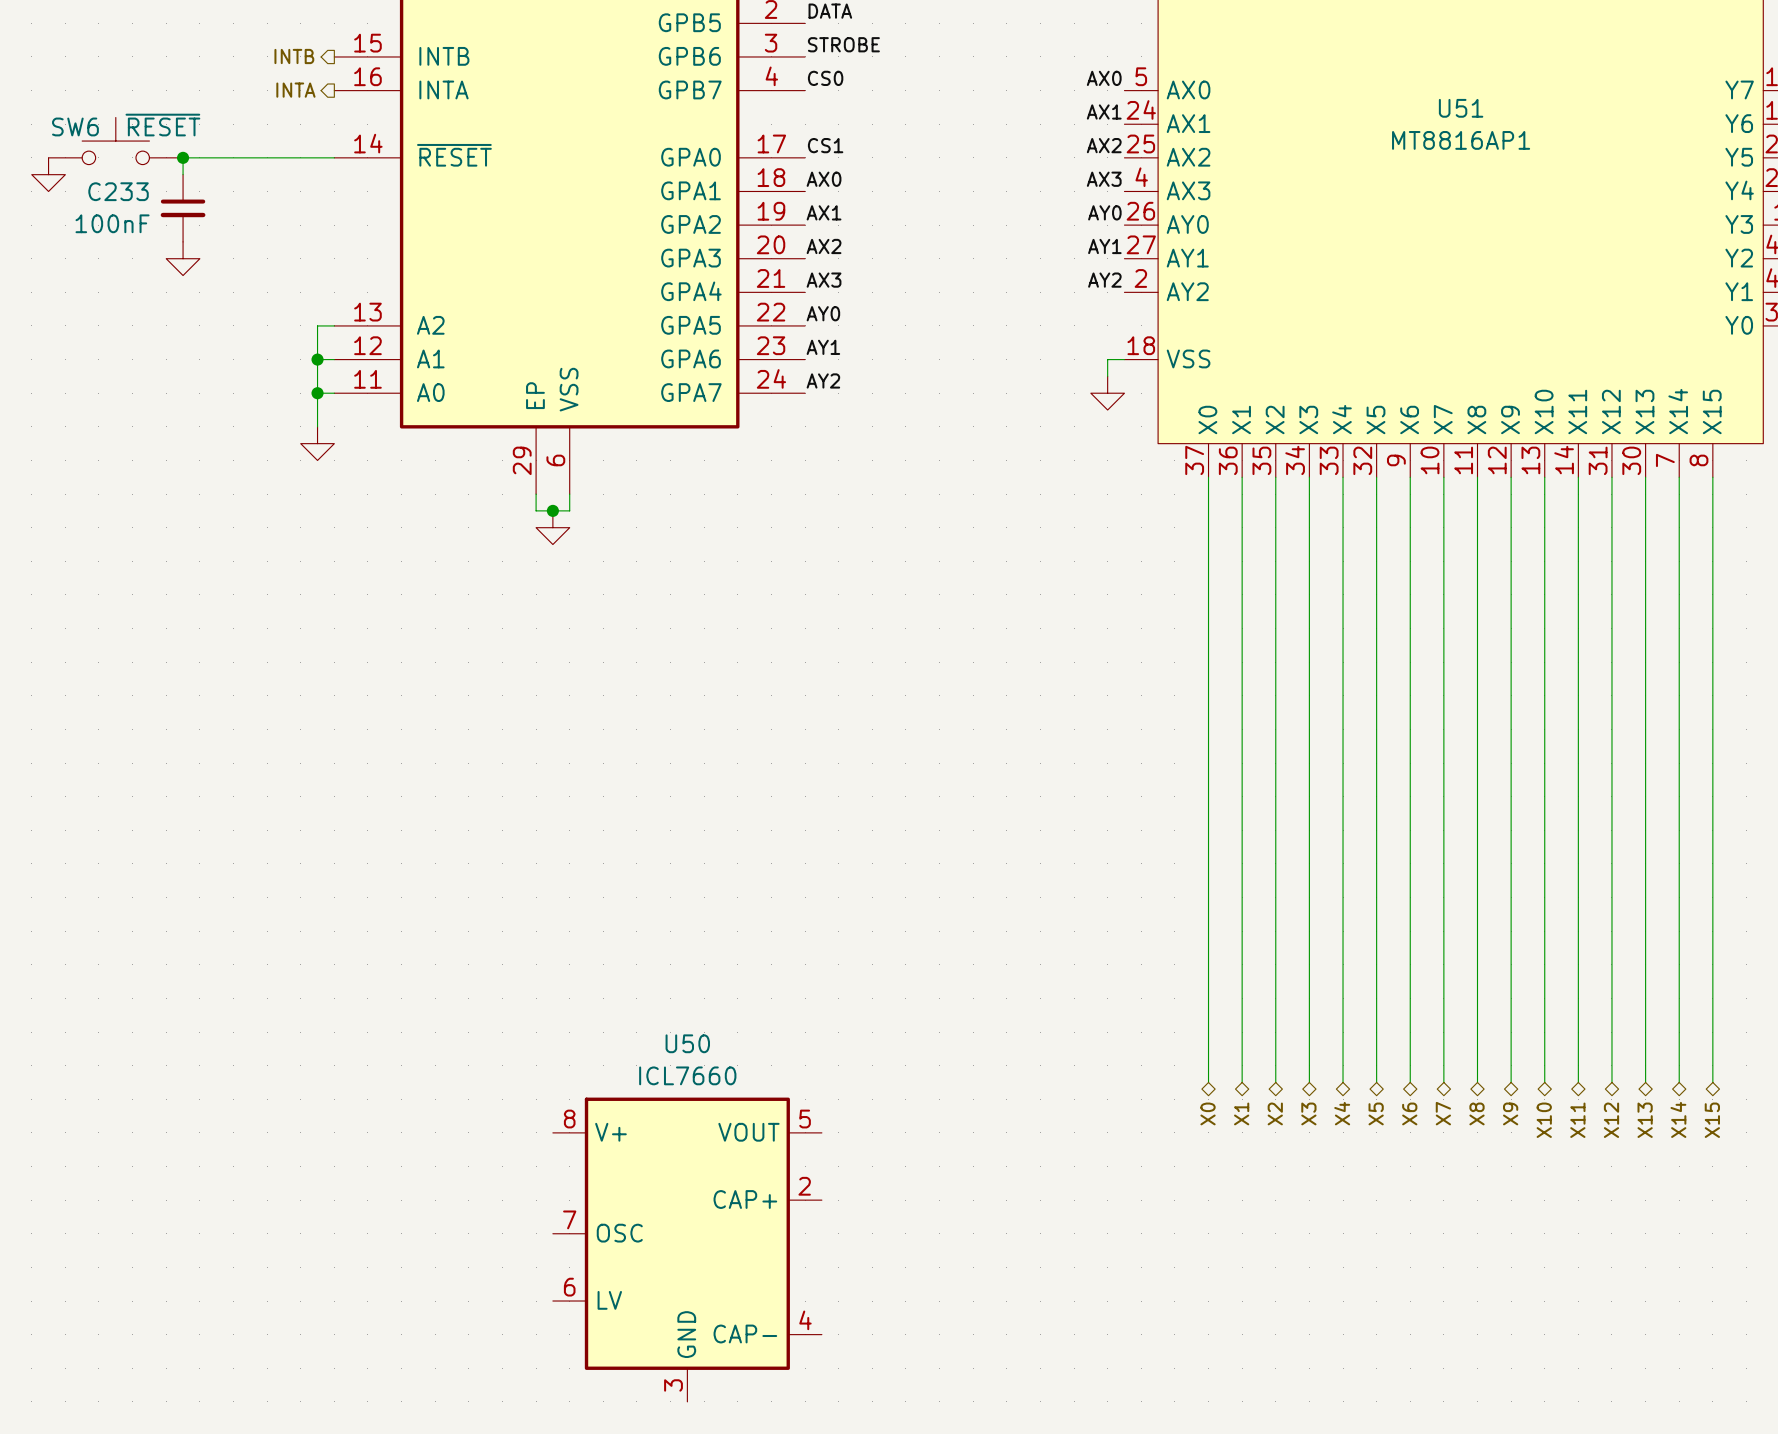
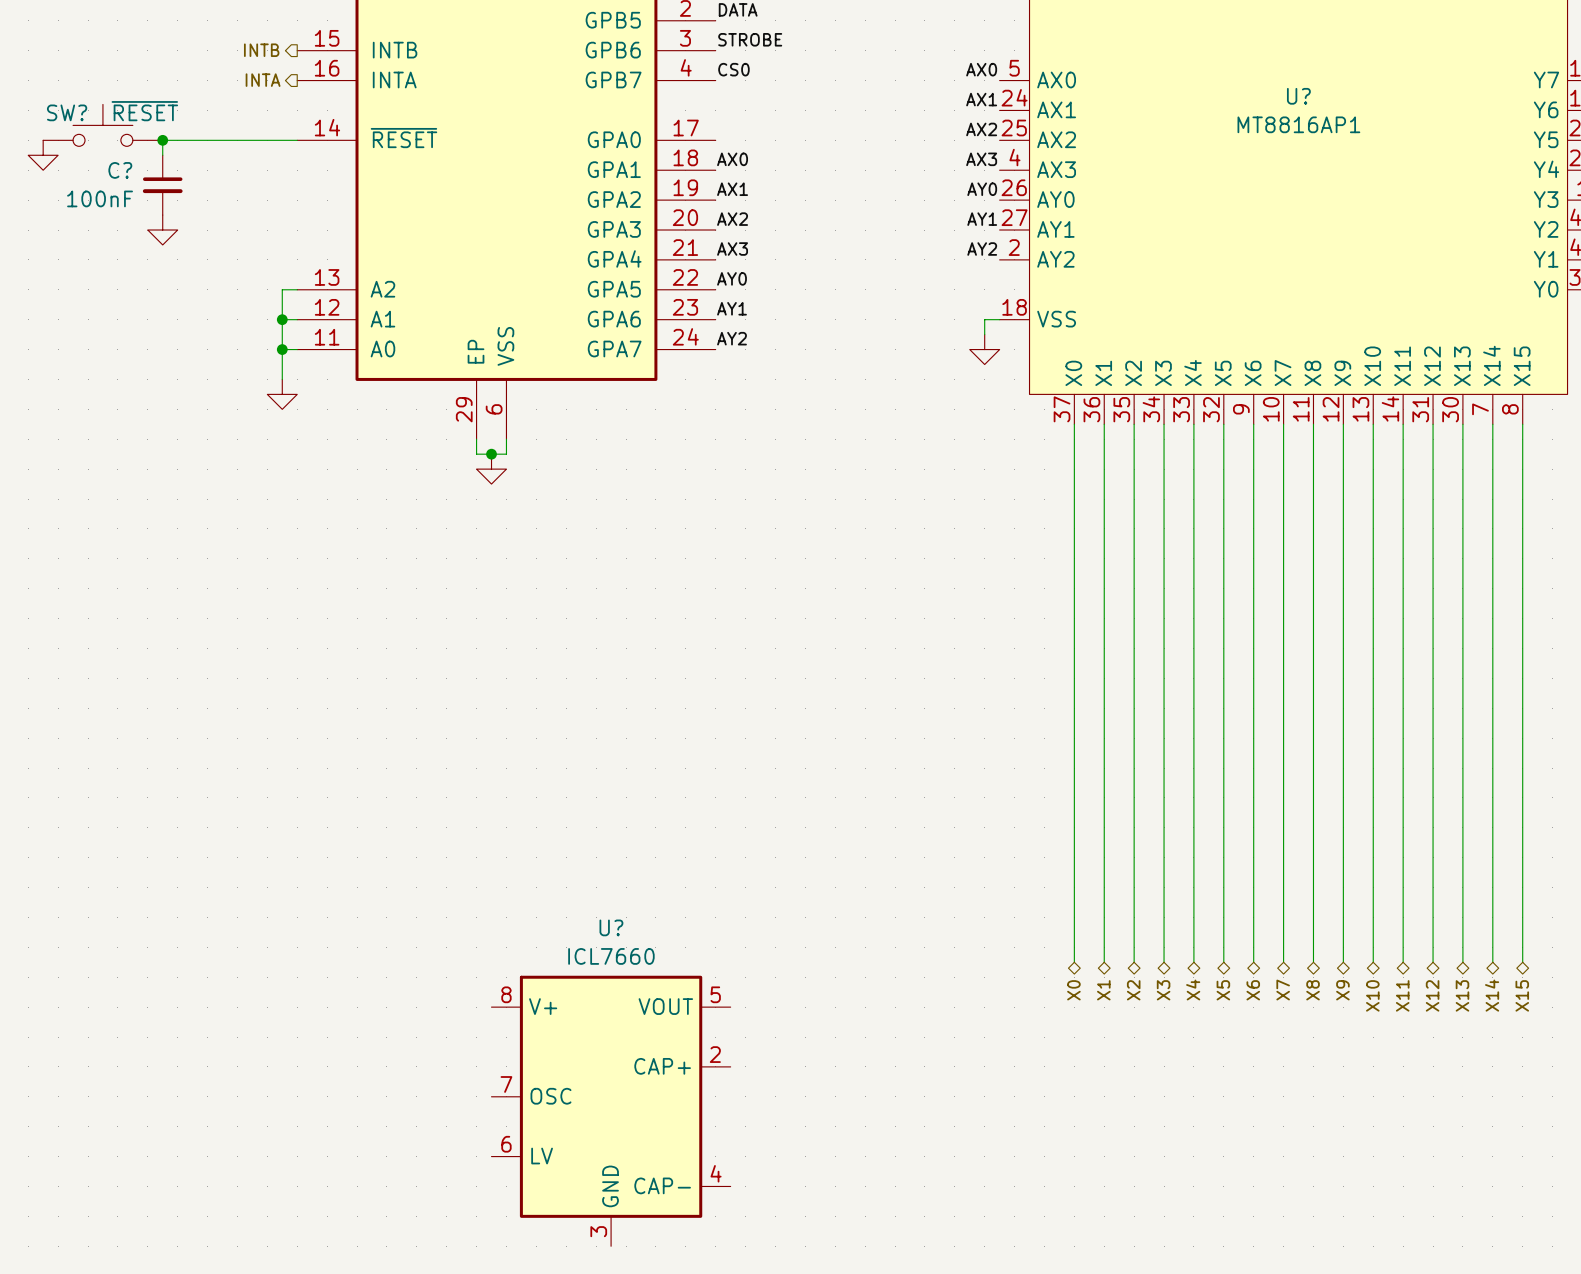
U51 name: U51 (1461, 108) -> U? (1298, 96)
SW6 name: SW6 (75, 126) -> SW? (67, 112)
label: CS1 (825, 145) -> none
C233 name: C233 (118, 191) -> C? (120, 170)
U50 name: U50 (687, 1043) -> U? (611, 927)

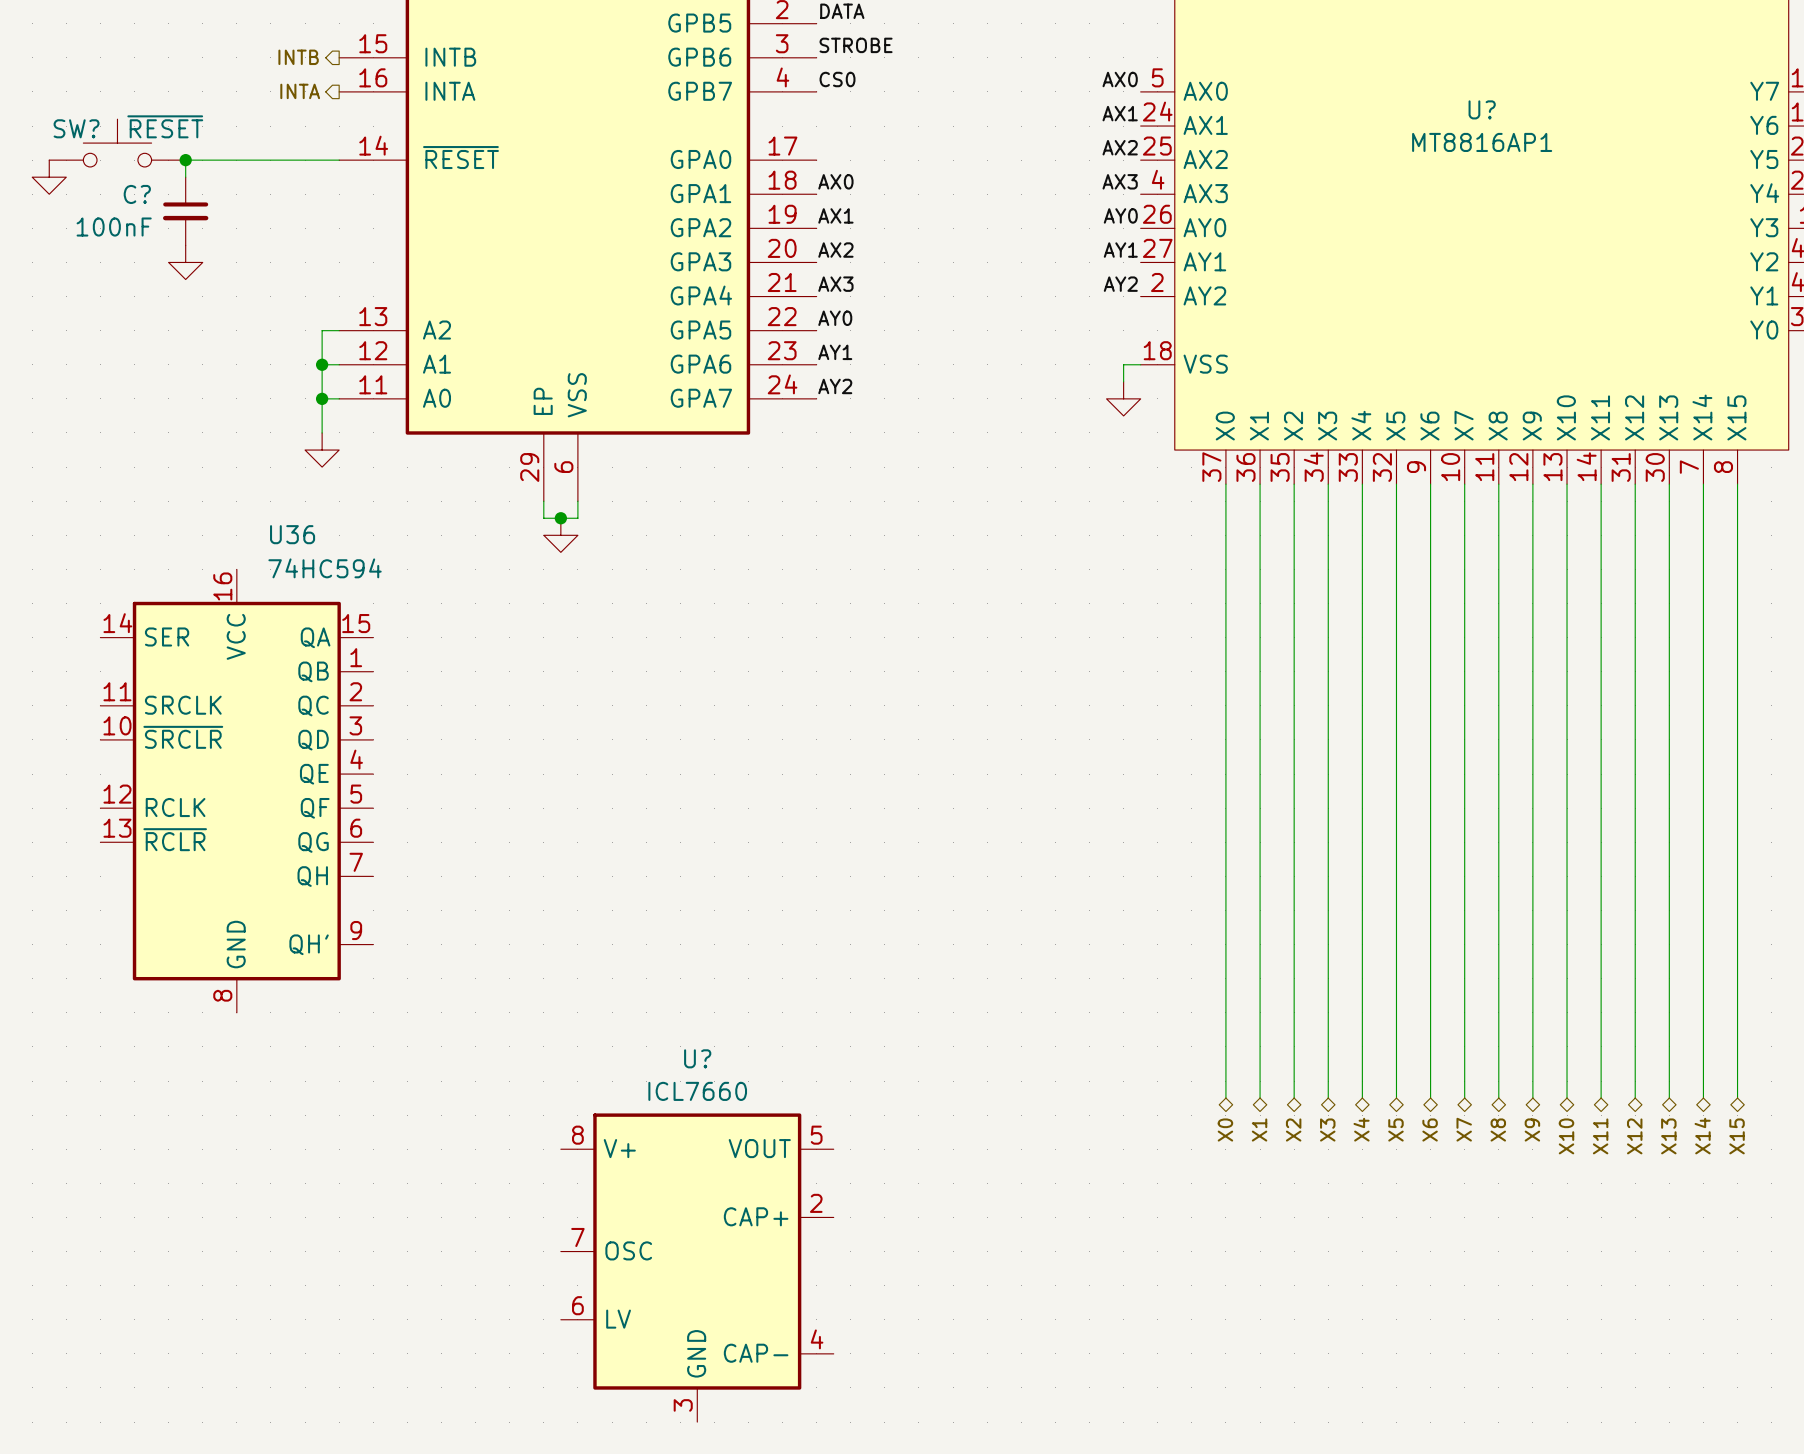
U36: none -> 74HC594 (236, 791)

